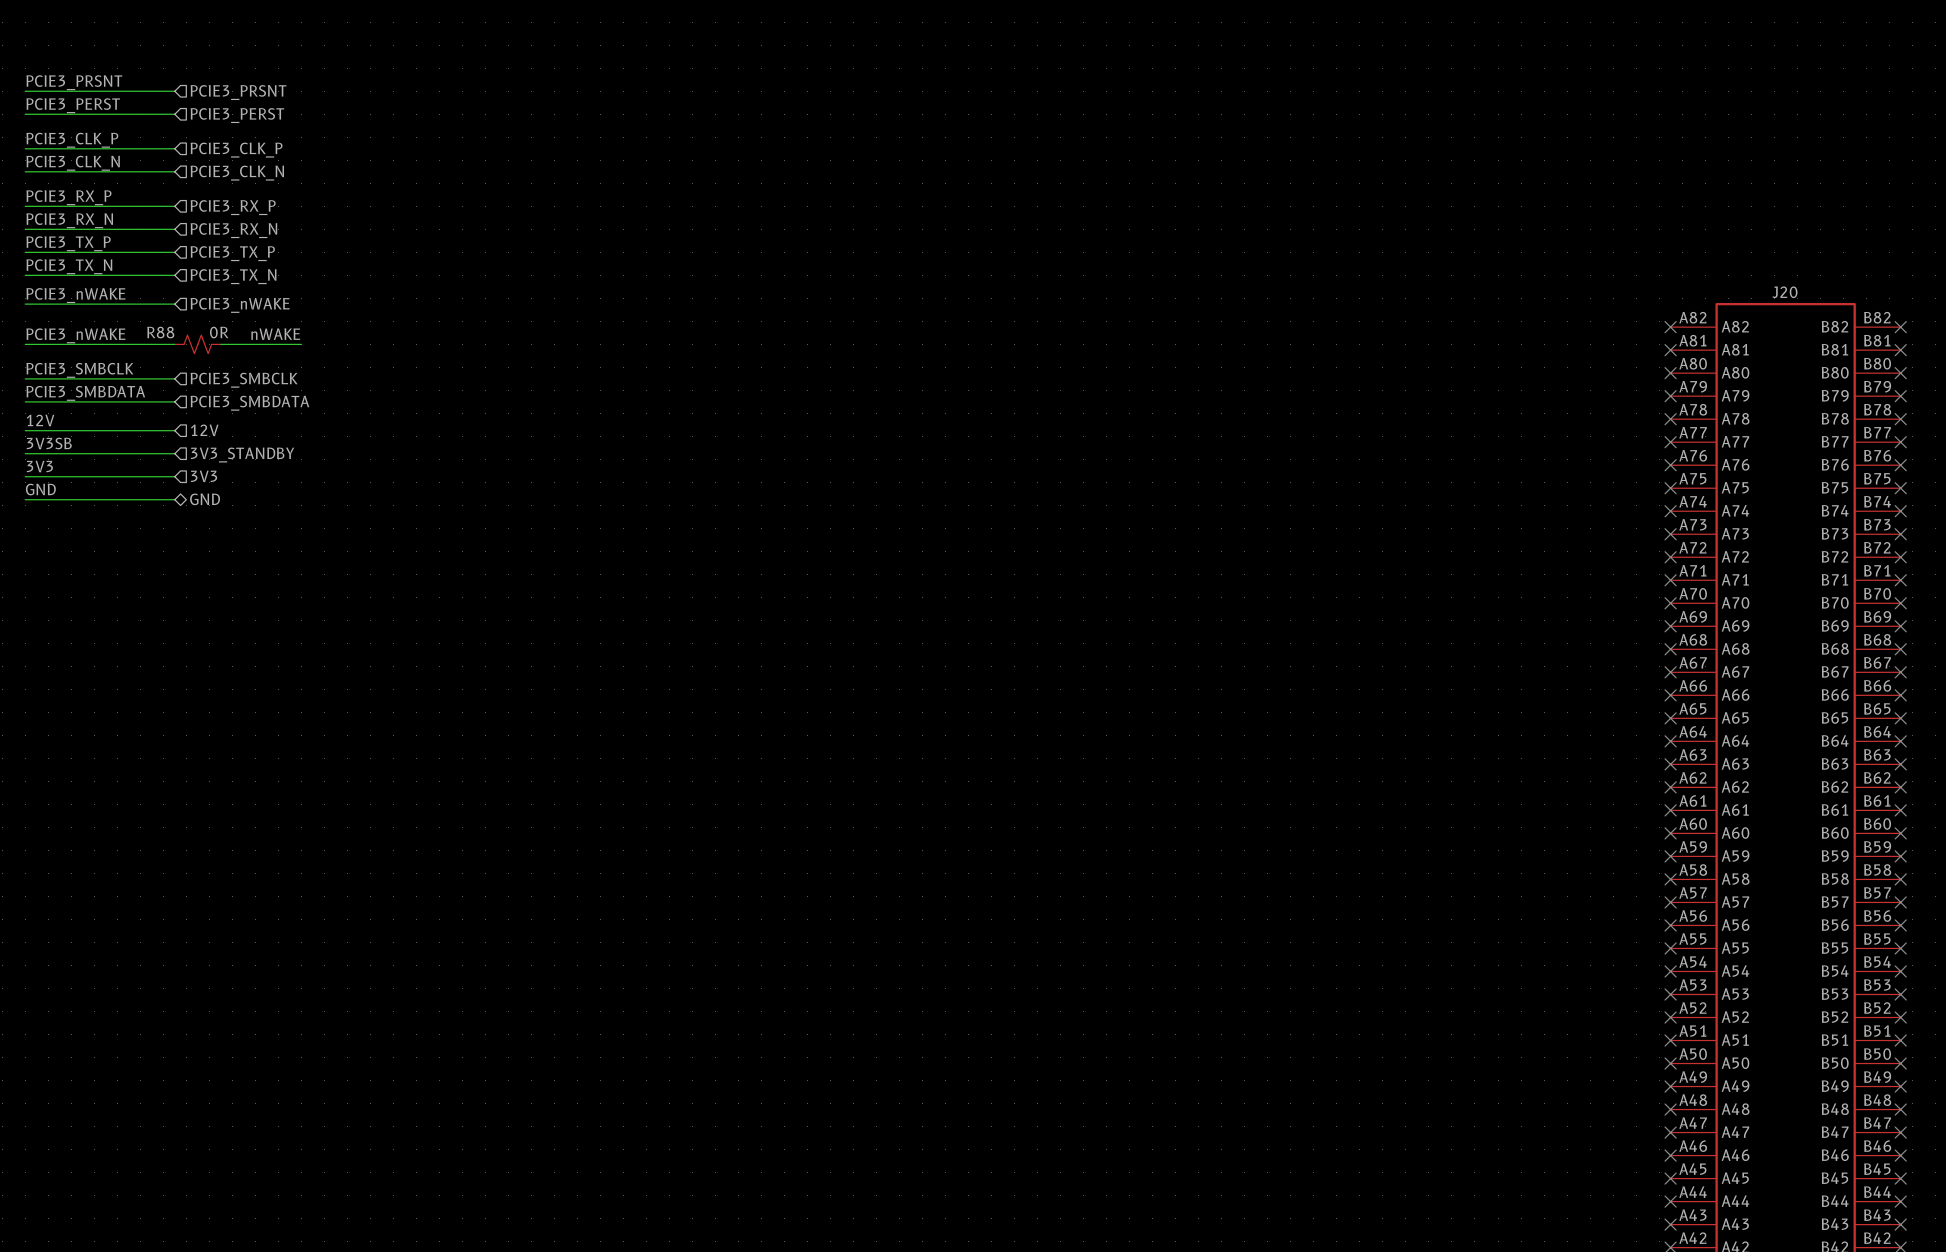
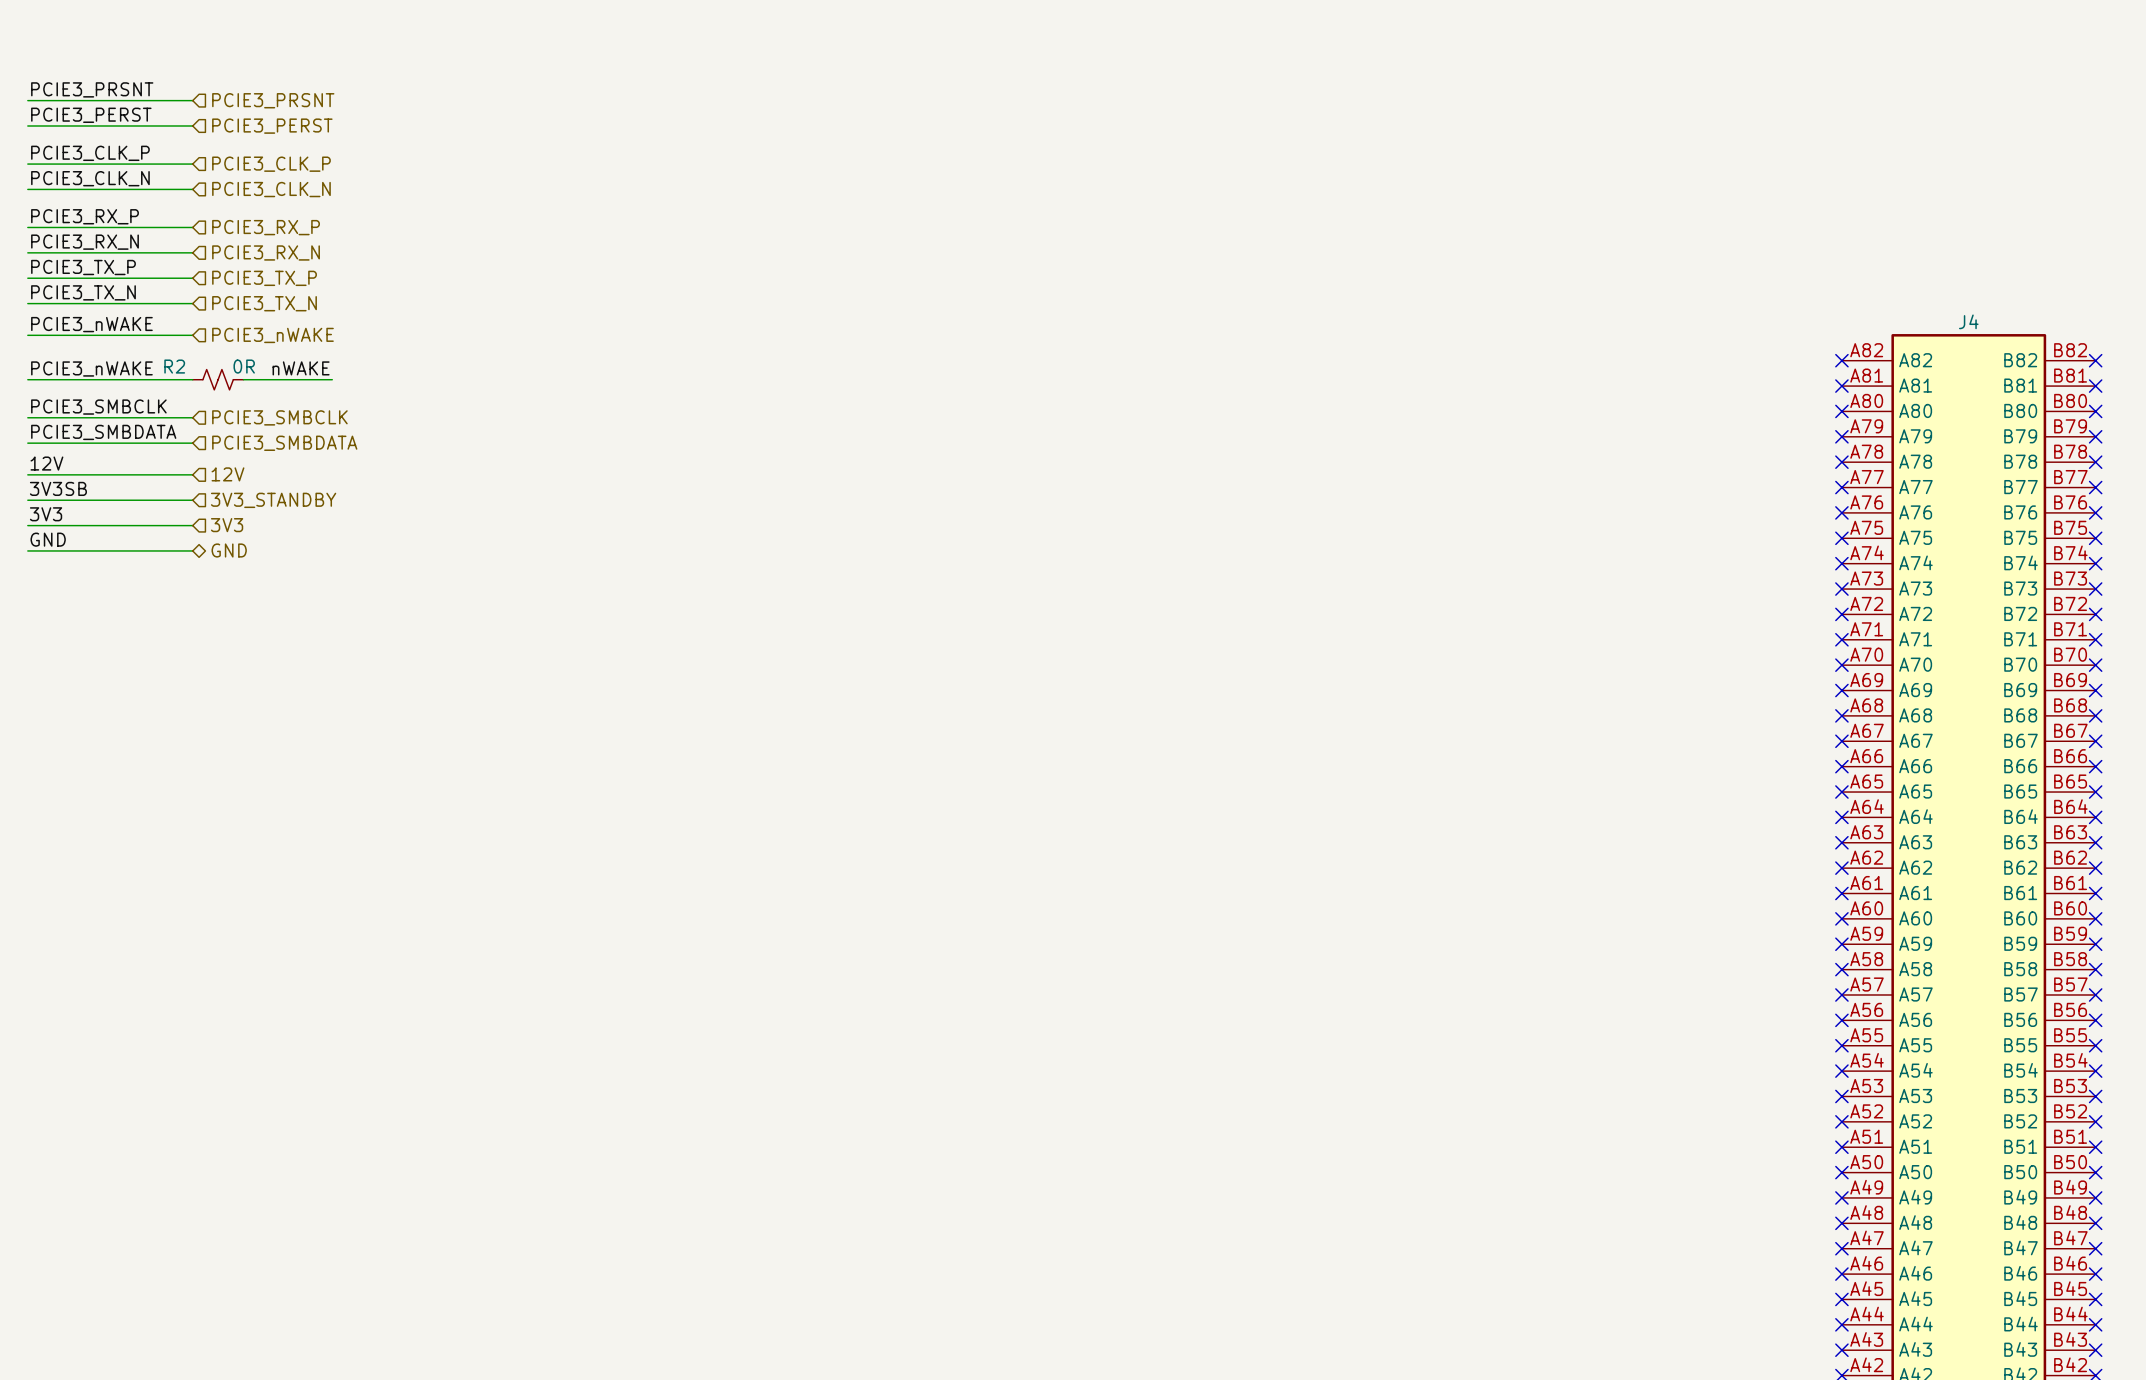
J20 name: J20 (1784, 292) -> J4 (1968, 321)
R88 name: R88 (160, 332) -> R2 (174, 366)

